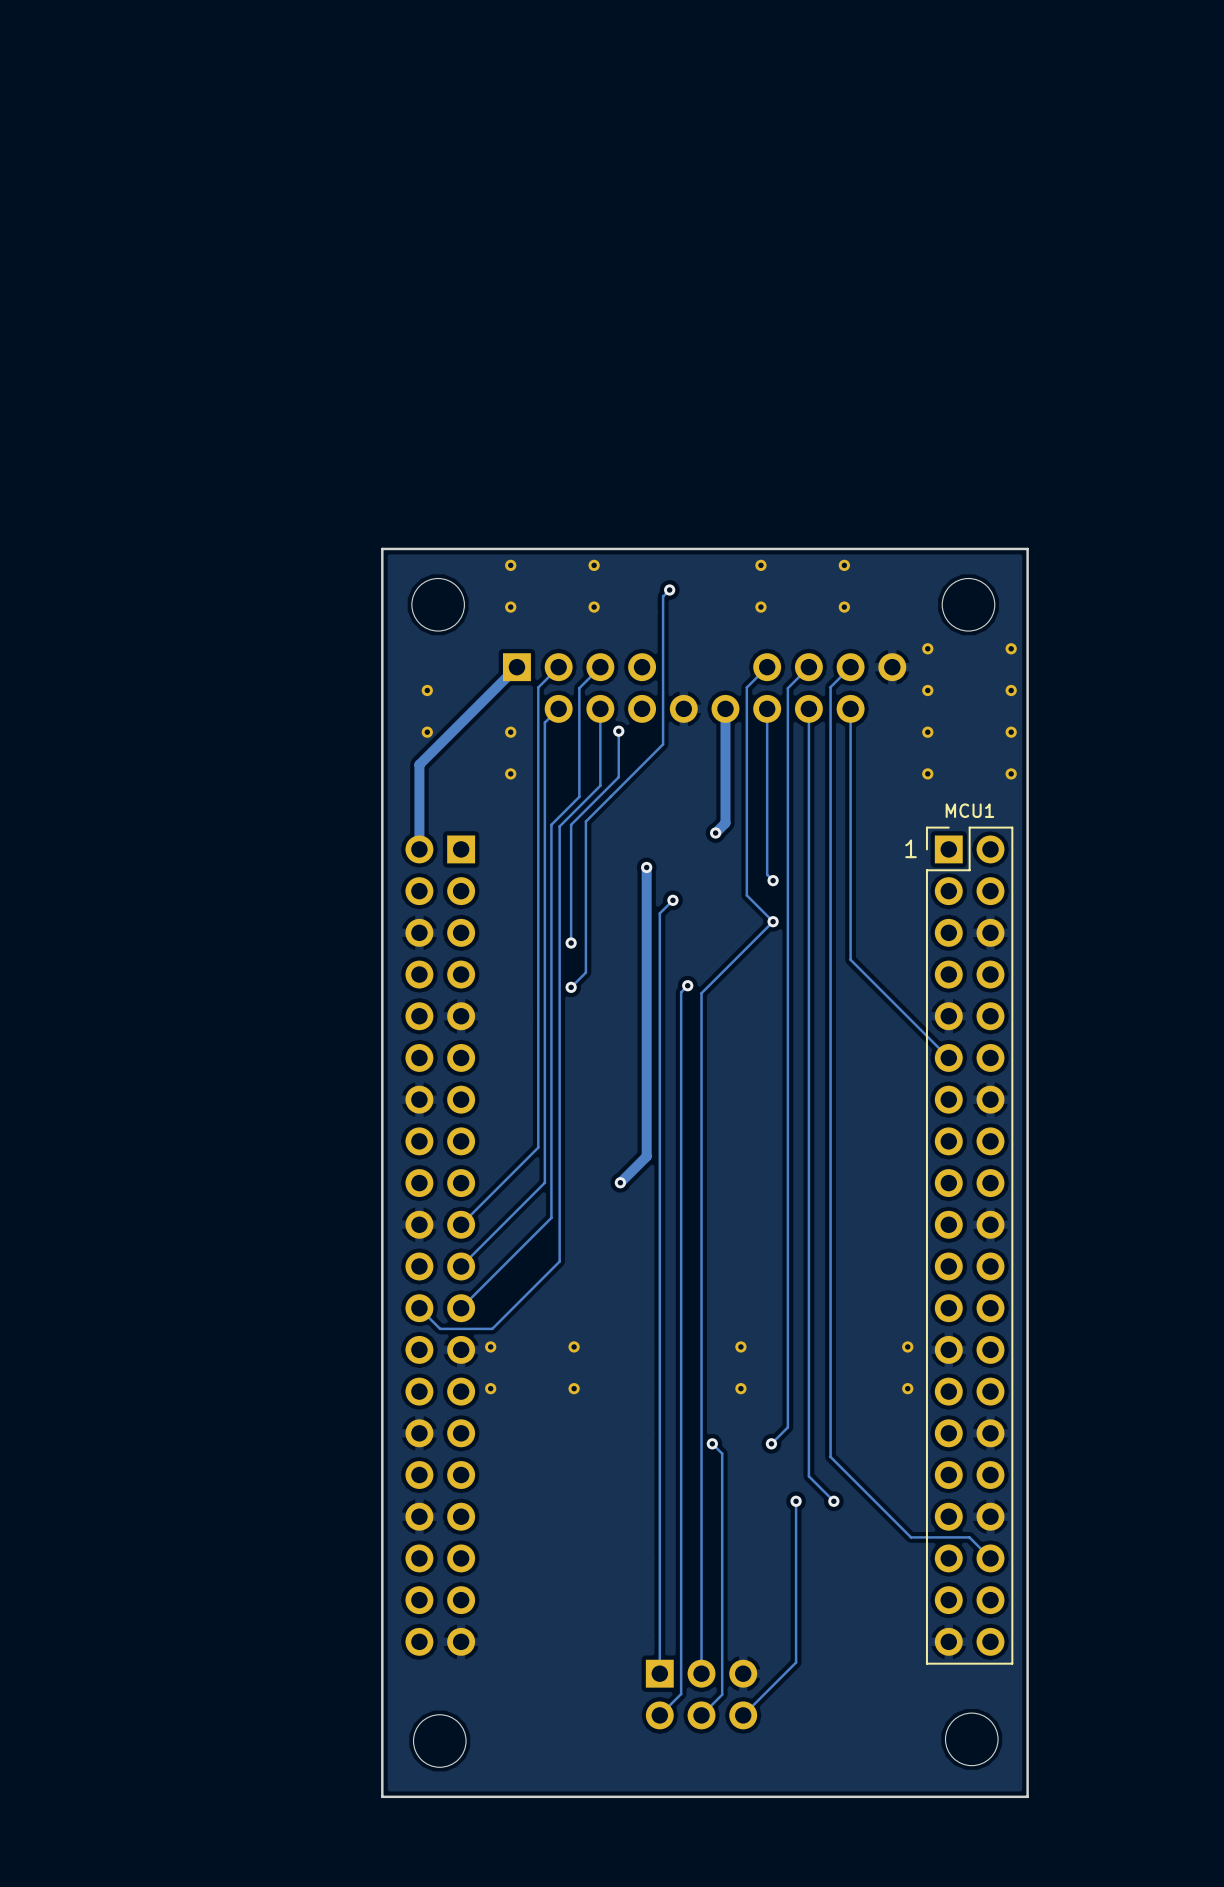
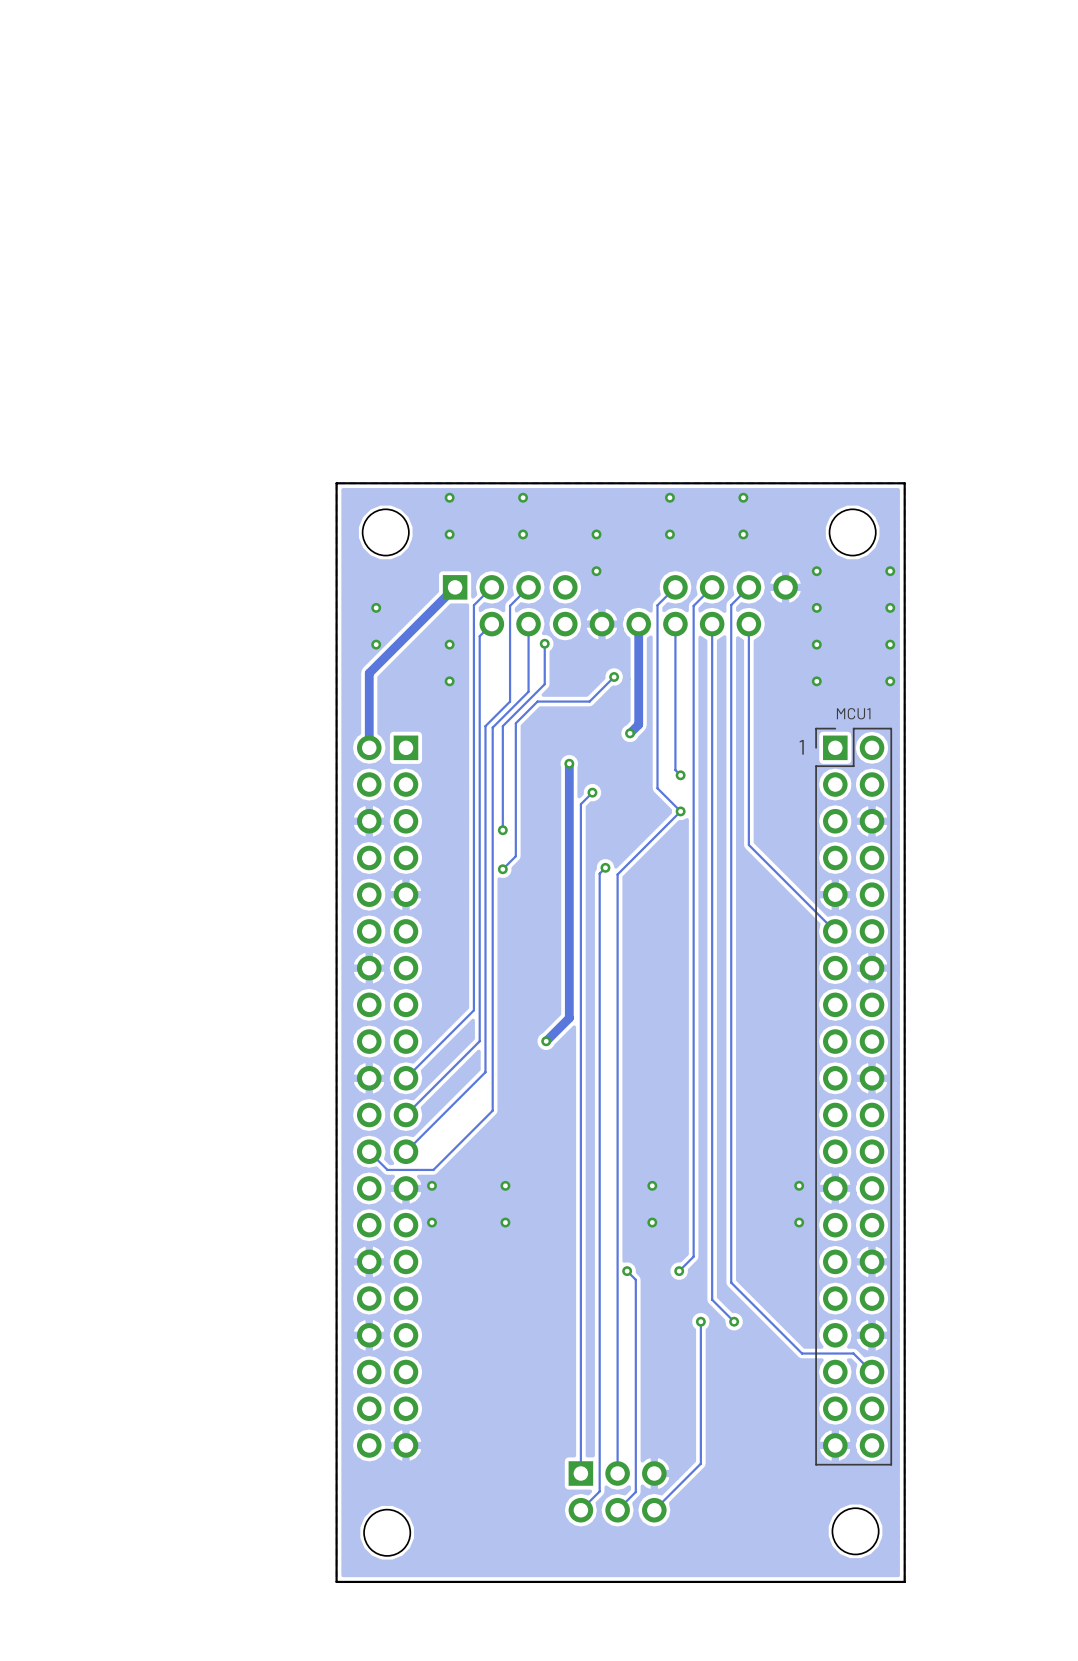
track: (669, 590) (663, 596) (663, 744) (610, 796) -> (614, 677) (589, 701) (537, 701)
via: (669, 590) -> none
part: none -> (596, 534)
part: none -> (596, 571)
via: none -> (614, 677)

